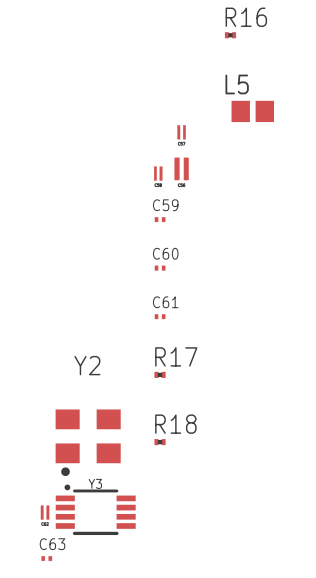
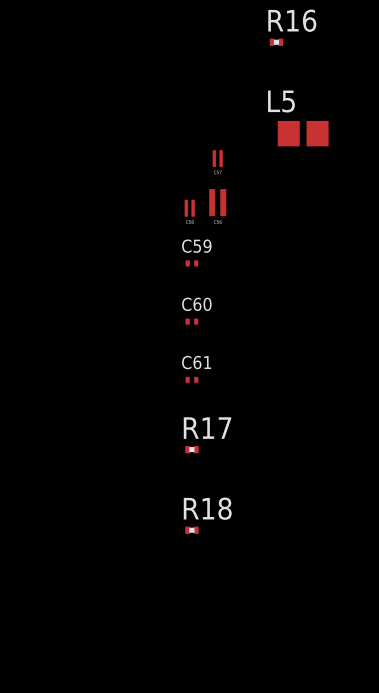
Y2: (88, 442) -> none
Y3: (95, 509) -> none
part: (45, 512) -> none
C63: (46, 558) -> none

